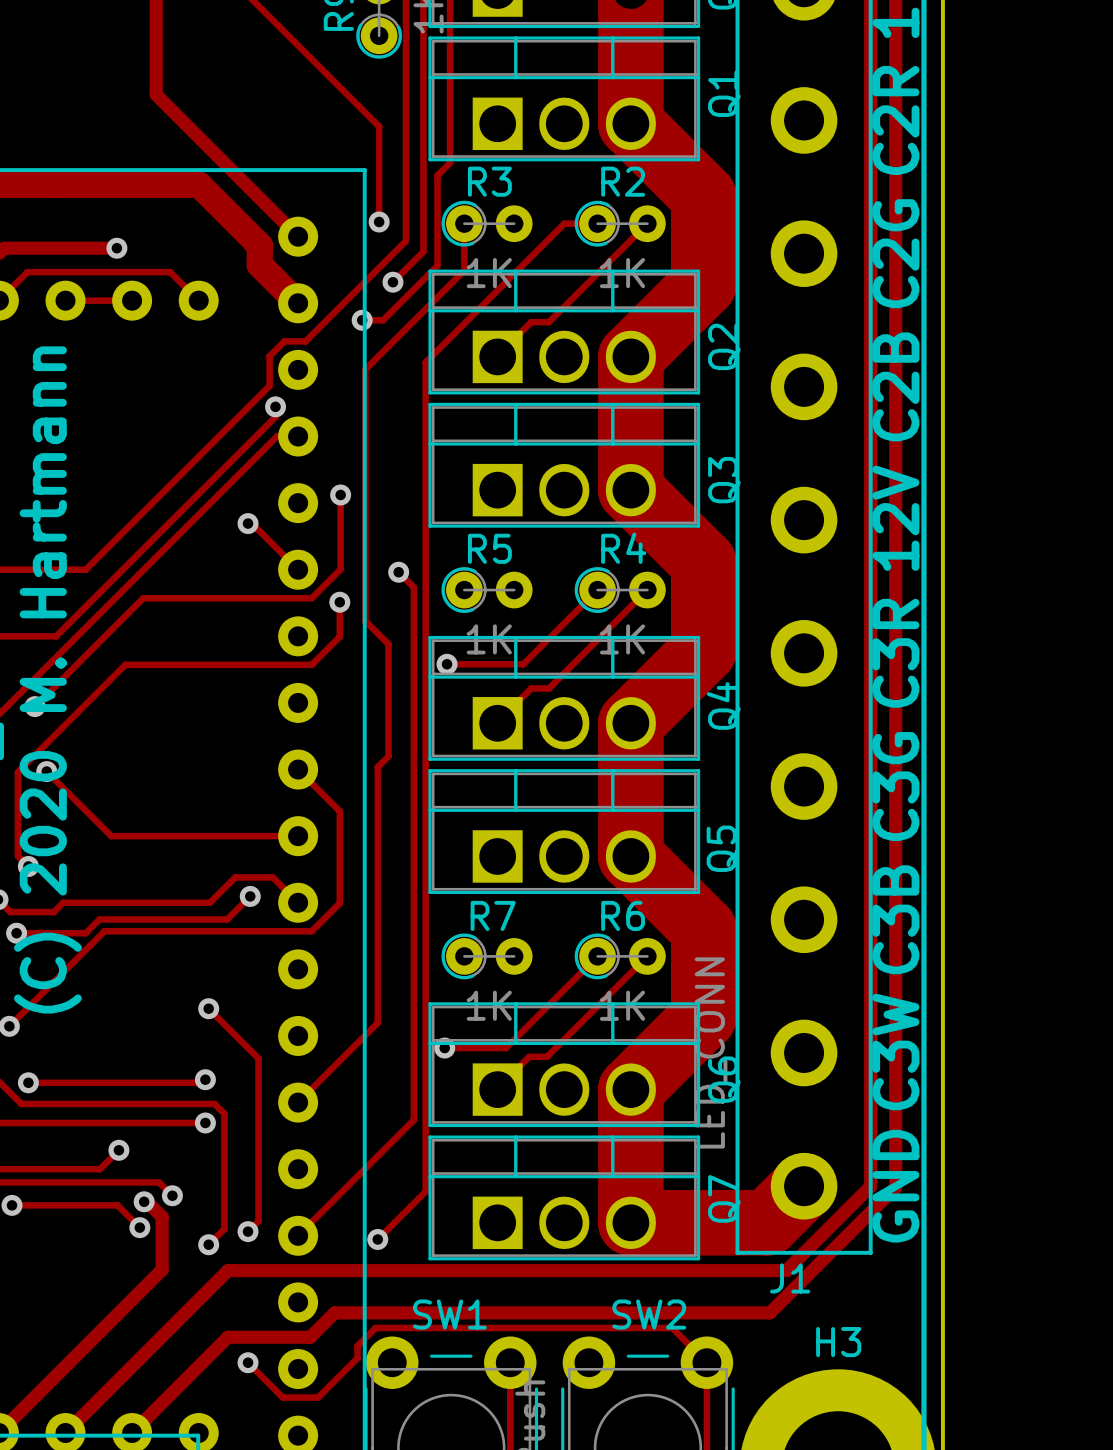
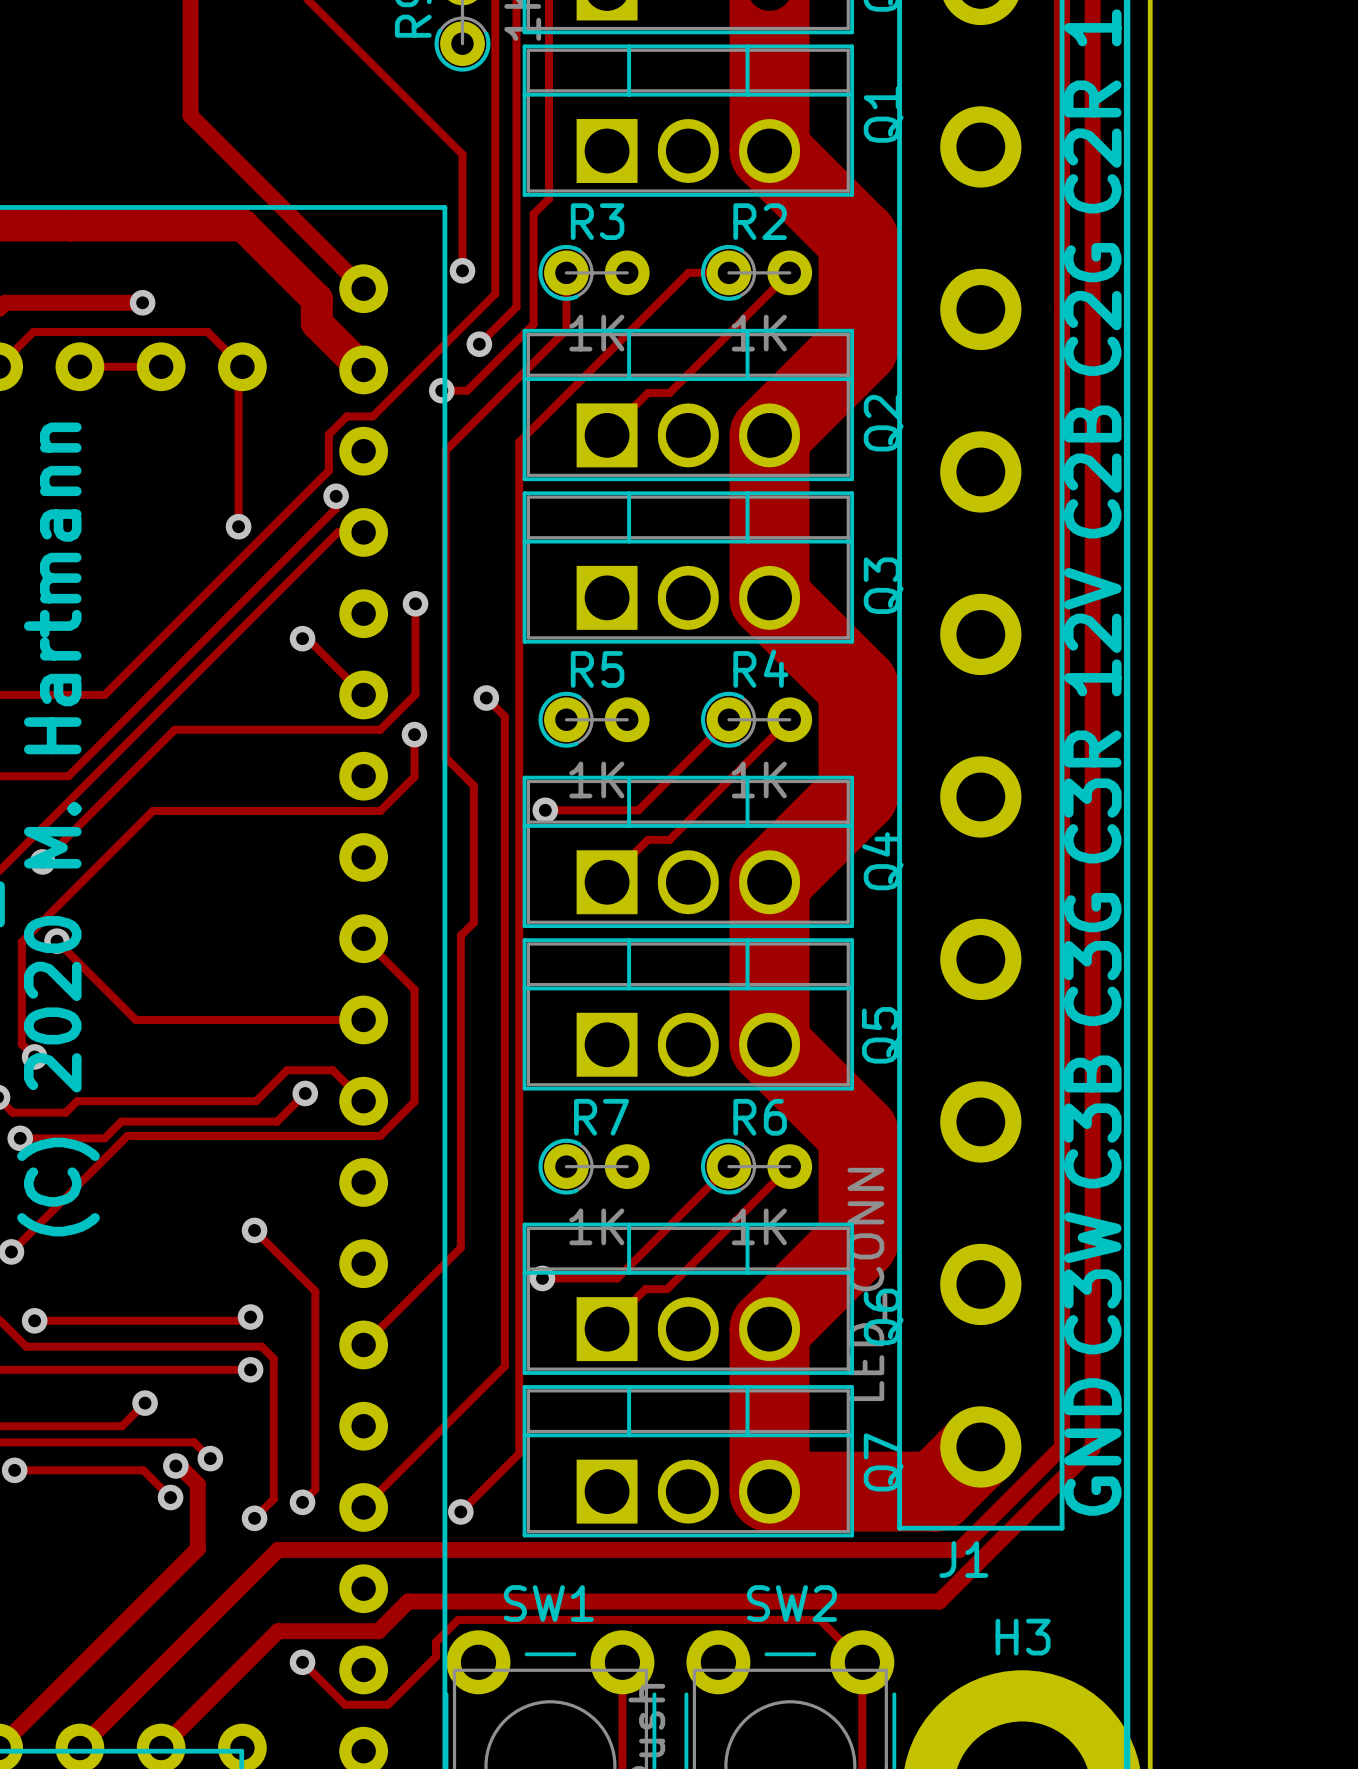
track: none -> (238, 370) (238, 526)
via: none -> (238, 526)

